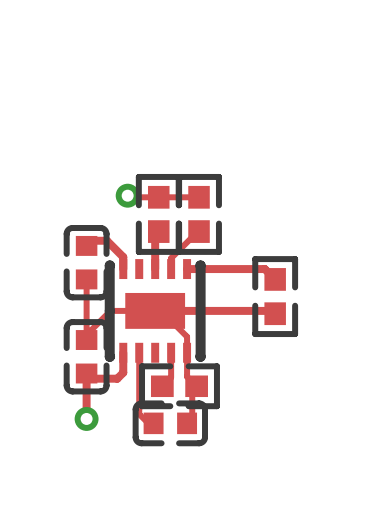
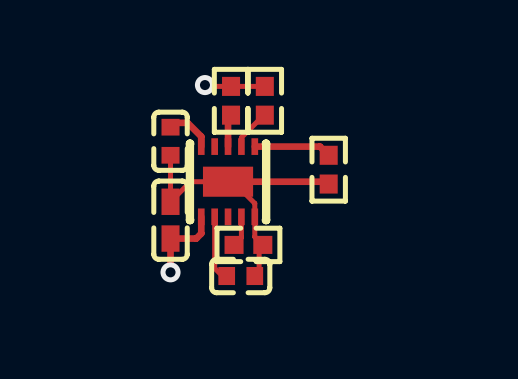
part footprint: [63, 319, 110, 395] -> [151, 178, 190, 262]

